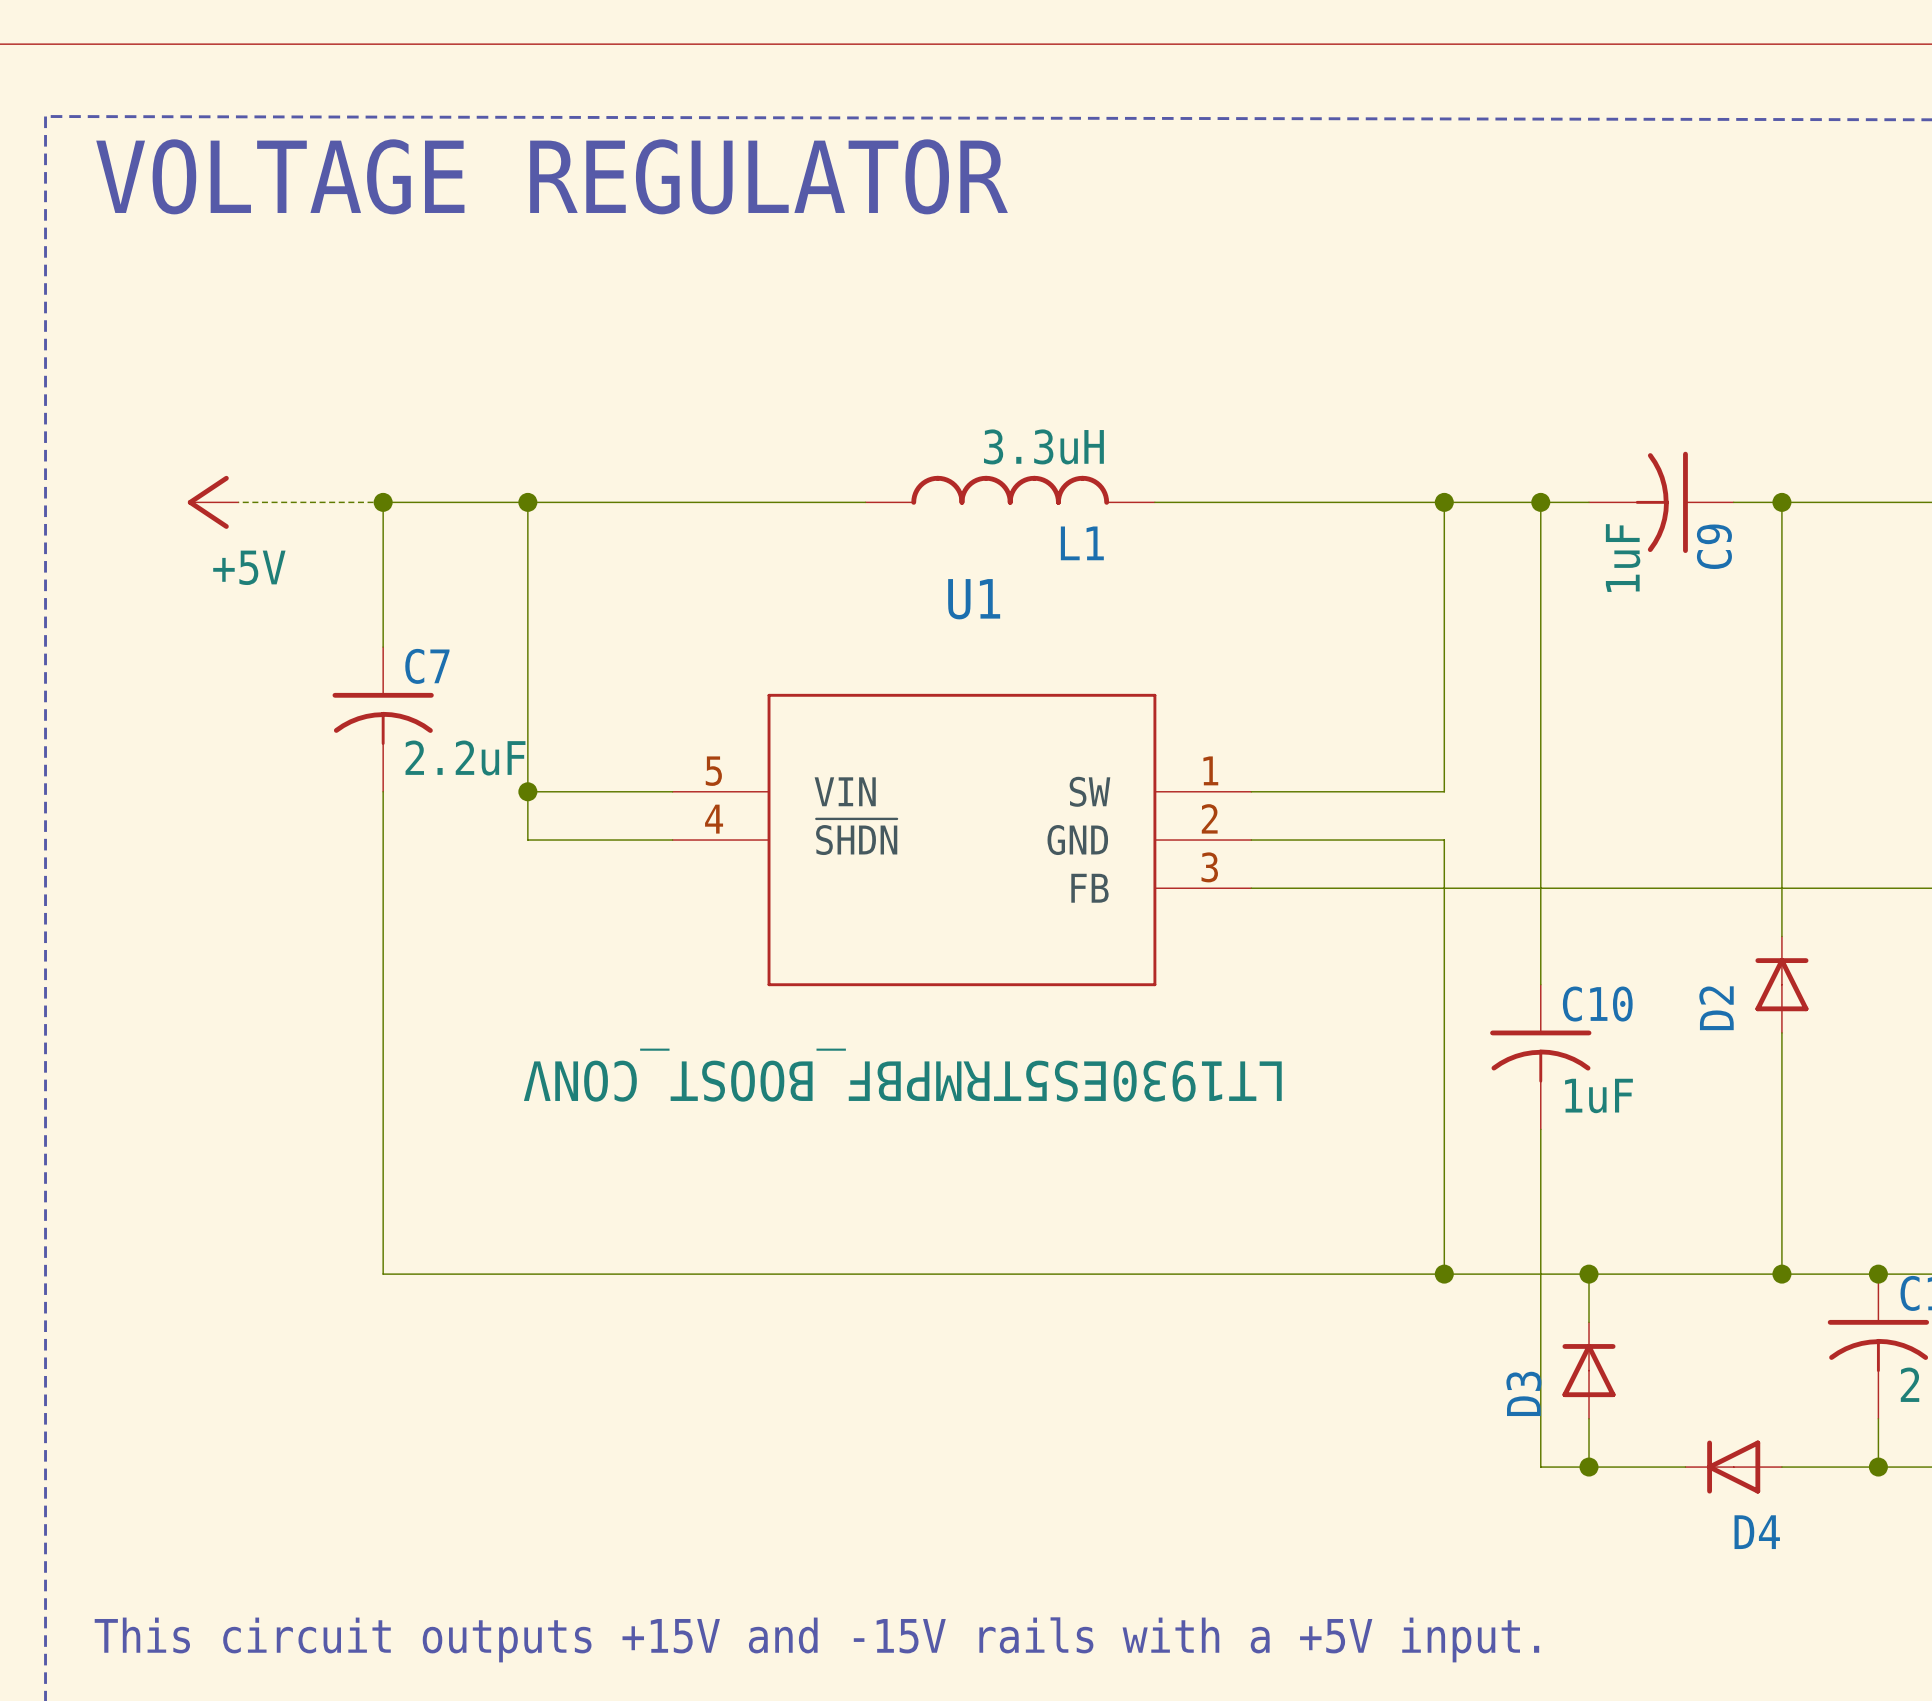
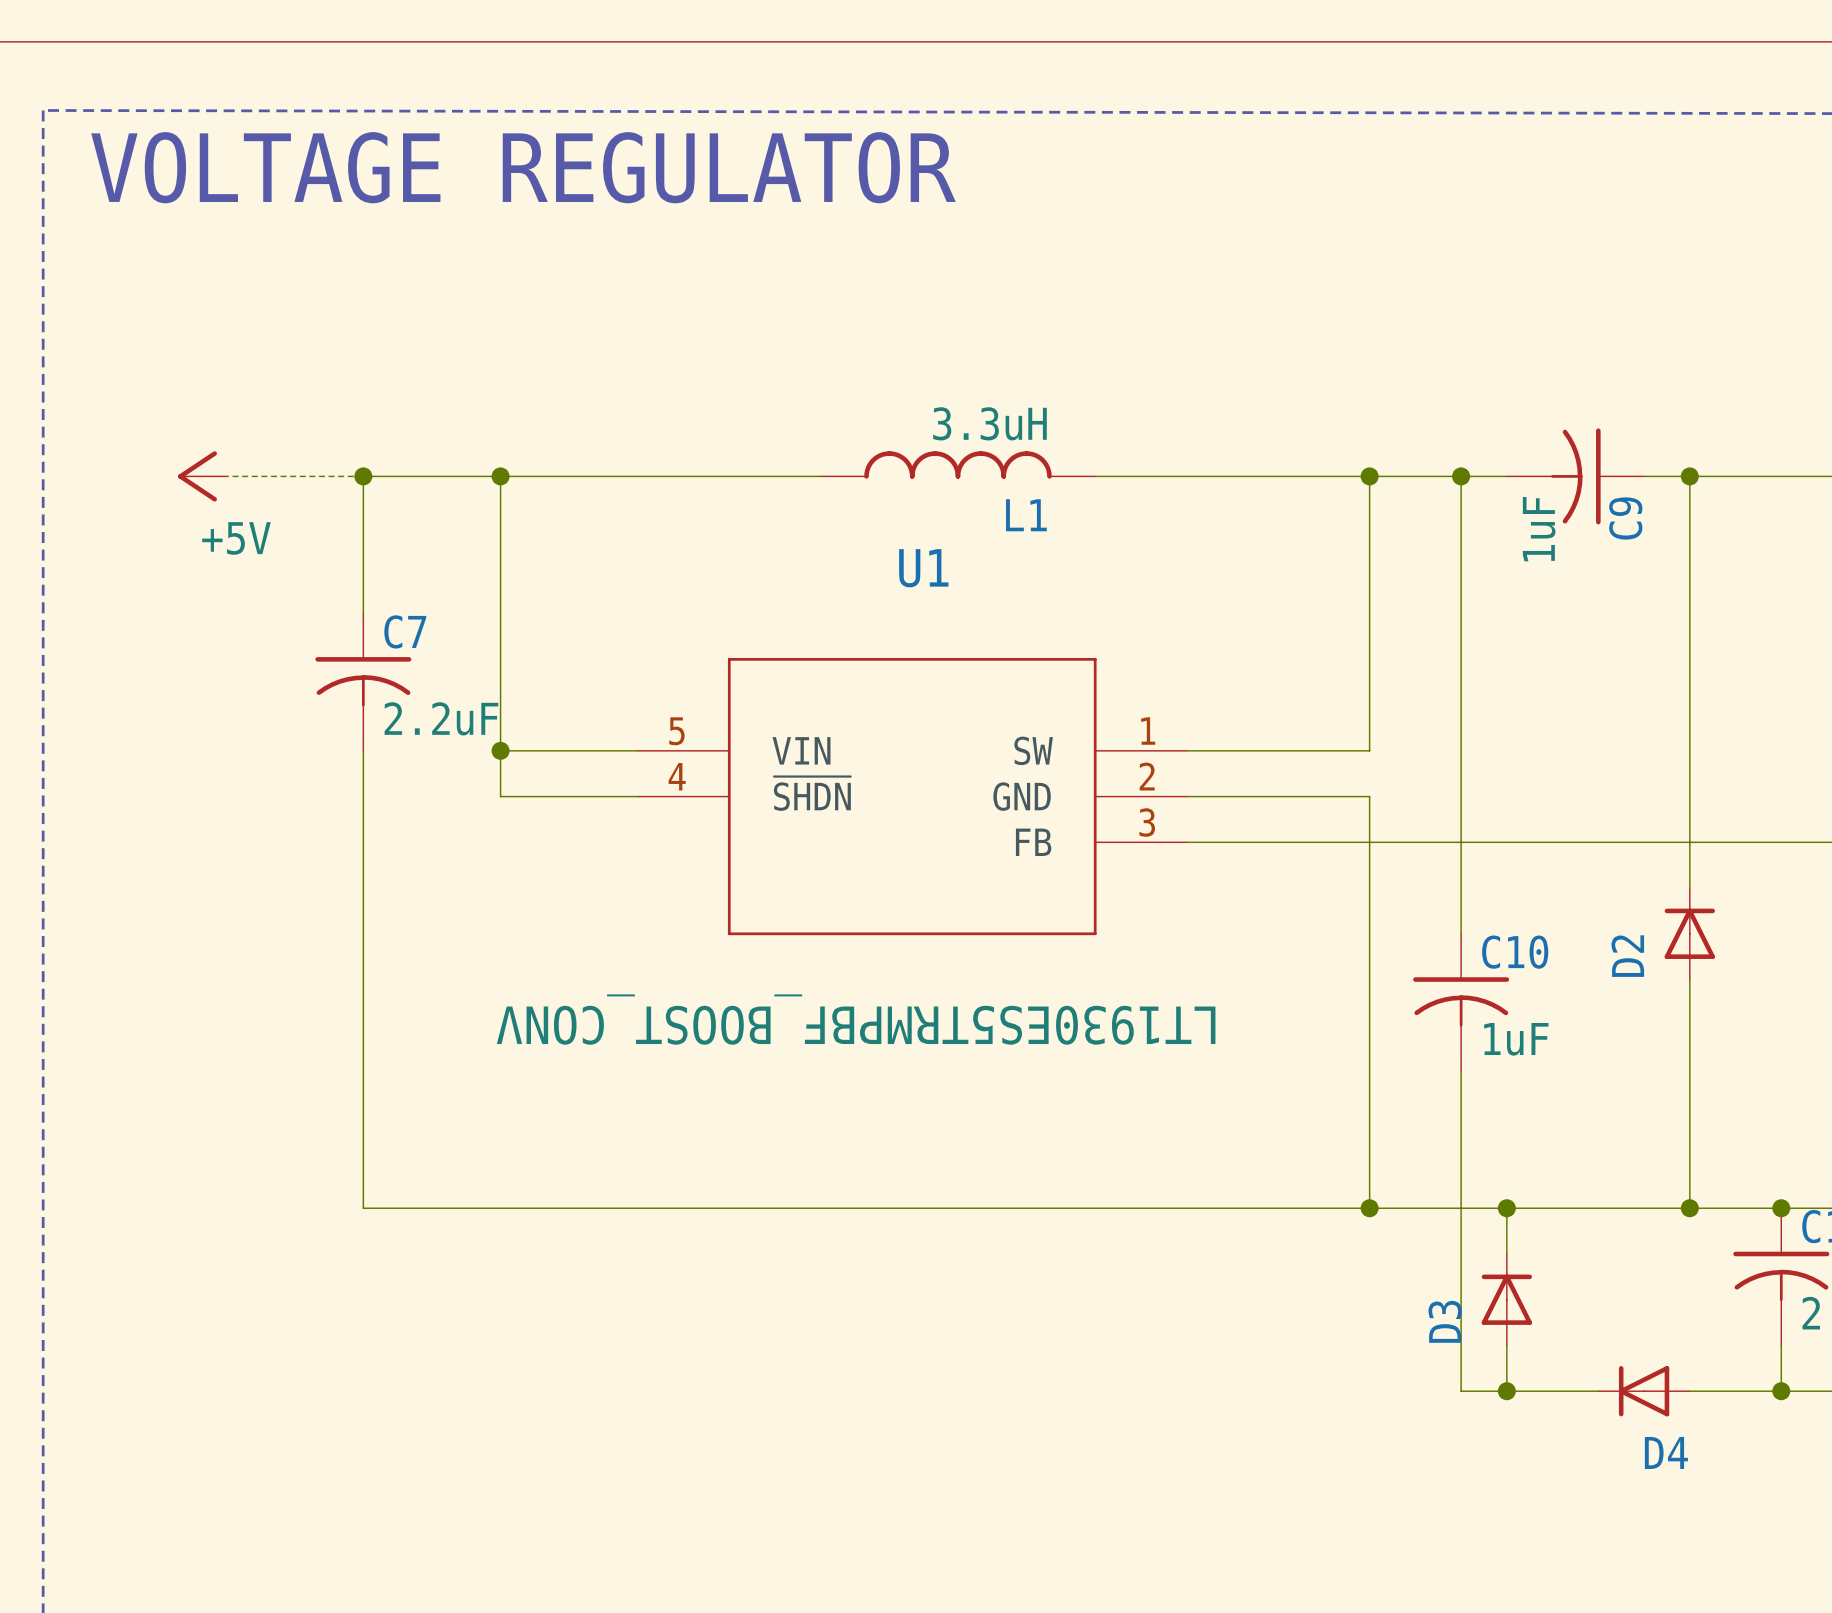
text: This circuit outputs +15V and -15V rails with a +5V input. (816, 1639) -> none

